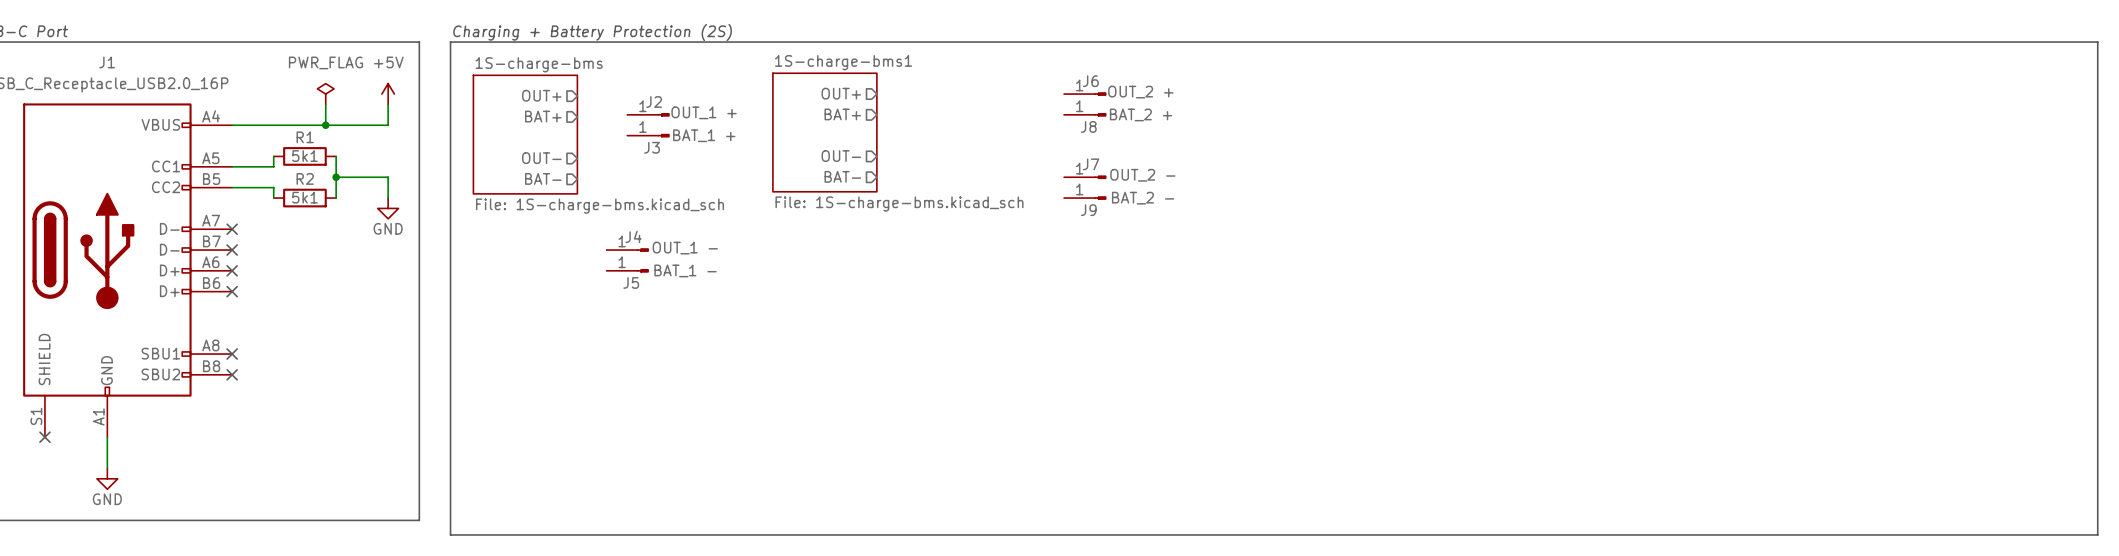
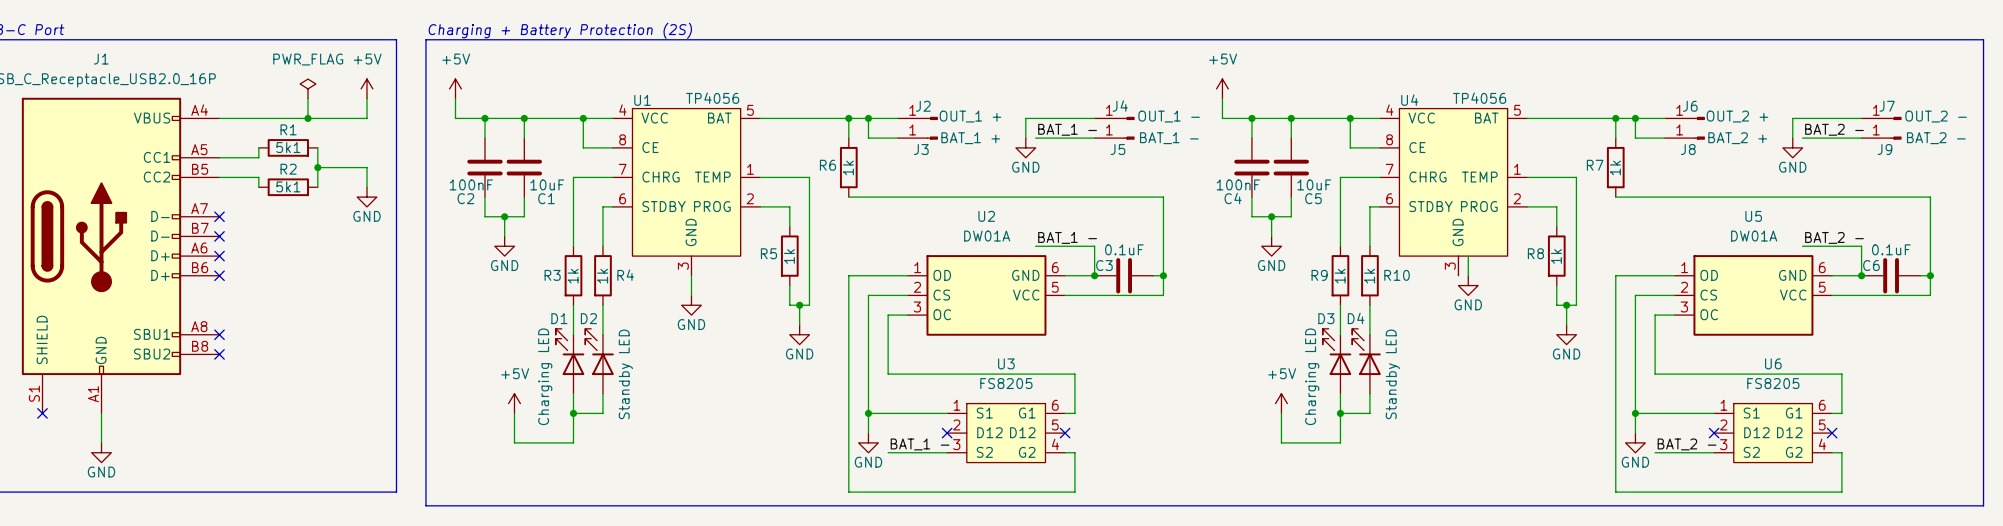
sheet pin: OUT+ (841, 93) -> none
power symbol: none -> +5V (455, 88)
J6 position: (1085, 94) -> (1684, 118)
power symbol: none -> +5V (1222, 88)
sheet pin: OUT+ (541, 95) -> none
wire: none -> (455, 98) (455, 118) (612, 118)
wire: none -> (1222, 98) (1222, 118) (1379, 118)
J2 position: (648, 114) -> (917, 118)
sheet pin: BAT+ (842, 114) -> none
J8 position: (1085, 114) -> (1684, 138)
sheet pin: BAT+ (543, 116) -> none
wire: none -> (484, 118) (484, 138)
junction: none -> (484, 118)
wire: none -> (524, 118) (524, 138)
junction: none -> (524, 118)
wire: none -> (583, 118) (583, 147) (612, 147)
junction: none -> (583, 118)
wire: none -> (760, 118) (897, 118)
wire: none -> (848, 118) (848, 138)
junction: none -> (848, 118)
wire: none -> (868, 118) (868, 138) (897, 138)
junction: none -> (868, 118)
wire: none -> (1094, 118) (1025, 118) (1025, 138)
wire: none -> (1251, 118) (1251, 138)
junction: none -> (1251, 118)
wire: none -> (1291, 118) (1291, 138)
junction: none -> (1291, 118)
wire: none -> (1350, 118) (1350, 147) (1379, 147)
junction: none -> (1350, 118)
wire: none -> (1527, 118) (1664, 118)
wire: none -> (1615, 118) (1615, 138)
junction: none -> (1615, 118)
wire: none -> (1635, 118) (1635, 138) (1664, 138)
junction: none -> (1635, 118)
wire: none -> (1861, 118) (1792, 118) (1792, 138)
sheet 1S-charge-bms1: File: 1S-charge-bms.kicad_sch (824, 132) -> none
sheet 1S-charge-bms: File: 1S-charge-bms.kicad_sch (525, 134) -> none
J3 position: (648, 135) -> (917, 138)
label: none -> BAT_1 - (1067, 129)
label: none -> BAT_2 - (1834, 129)
wire: none -> (1035, 138) (1094, 138)
wire: none -> (1802, 138) (1861, 138)
sheet pin: OUT- (841, 156) -> none
power symbol: none -> GND (1025, 147)
power symbol: none -> GND (1792, 147)
sheet pin: OUT- (541, 158) -> none
sheet pin: BAT- (842, 176) -> none
C2: none -> 100nF (484, 167)
C1: none -> 10uF (524, 167)
R6: none -> 1k (848, 167)
J7 position: (1085, 177) -> (1881, 118)
C4: none -> 100nF (1251, 167)
C5: none -> 10uF (1291, 167)
R7: none -> 1k (1615, 167)
sheet pin: BAT- (543, 178) -> none
wire: none -> (612, 177) (573, 177) (573, 246)
wire: none -> (760, 177) (809, 177) (809, 305) (789, 305) (789, 285)
wire: none -> (1379, 177) (1340, 177) (1340, 246)
wire: none -> (1527, 177) (1576, 177) (1576, 305) (1556, 305) (1556, 285)
J9 position: (1085, 198) -> (1881, 138)
U1: none -> TP4056 (686, 192)
U4: none -> TP4056 (1453, 192)
wire: none -> (484, 197) (484, 216) (524, 216) (524, 197)
wire: none -> (848, 197) (1163, 197) (1163, 295) (1065, 295)
wire: none -> (1251, 197) (1251, 216) (1291, 216) (1291, 197)
wire: none -> (1615, 197) (1930, 197) (1930, 295) (1832, 295)
wire: none -> (612, 206) (602, 206) (602, 246)
wire: none -> (760, 206) (789, 206) (789, 226)
wire: none -> (1379, 206) (1369, 206) (1369, 246)
wire: none -> (1527, 206) (1556, 206) (1556, 226)
wire: none -> (504, 216) (504, 236)
junction: none -> (504, 216)
wire: none -> (1271, 216) (1271, 236)
junction: none -> (1271, 216)
J4 position: (627, 250) -> (1114, 118)
label: none -> BAT_1 - (1067, 237)
label: none -> BAT_2 - (1834, 237)
power symbol: none -> GND (504, 246)
wire: none -> (1035, 246) (1094, 246) (1094, 275) (1065, 275)
power symbol: none -> GND (1271, 246)
wire: none -> (1802, 246) (1861, 246) (1861, 275) (1832, 275)
J5 position: (627, 270) -> (1114, 138)
R5: none -> 1k (789, 256)
wire: none -> (1468, 256) (1468, 275)
R8: none -> 1k (1556, 256)
R3: none -> 1k (573, 275)
R4: none -> 1k (602, 275)
wire: none -> (691, 275) (691, 295)
wire: none -> (907, 275) (848, 275) (848, 492) (1074, 492) (1074, 452) (1065, 452)
junction: none -> (1094, 275)
C3: none -> 0.1uF (1124, 275)
wire: none -> (1153, 275) (1163, 275)
junction: none -> (1163, 275)
R9: none -> 1k (1340, 275)
R10: none -> 1k (1369, 275)
wire: none -> (1674, 275) (1615, 275) (1615, 492) (1841, 492) (1841, 452) (1832, 452)
junction: none -> (1861, 275)
C6: none -> 0.1uF (1891, 275)
wire: none -> (1920, 275) (1930, 275)
junction: none -> (1930, 275)
power symbol: none -> GND (1468, 285)
wire: none -> (907, 295) (868, 295) (868, 433)
U2: none -> DW01A (986, 295)
wire: none -> (1674, 295) (1635, 295) (1635, 433)
U5: none -> DW01A (1753, 295)
wire: none -> (573, 305) (573, 334)
wire: none -> (602, 305) (602, 334)
power symbol: none -> GND (691, 305)
wire: none -> (799, 305) (799, 324)
junction: none -> (799, 305)
wire: none -> (1340, 305) (1340, 334)
wire: none -> (1369, 305) (1369, 334)
wire: none -> (1566, 305) (1566, 324)
junction: none -> (1566, 305)
wire: none -> (907, 315) (888, 315) (888, 374) (1074, 374) (1074, 413) (1065, 413)
wire: none -> (1674, 315) (1655, 315) (1655, 374) (1841, 374) (1841, 413) (1832, 413)
power symbol: none -> GND (799, 334)
power symbol: none -> GND (1566, 334)
D1: none -> Charging LED (570, 361)
D2: none -> Standby LED (599, 361)
D3: none -> Charging LED (1337, 361)
D4: none -> Standby LED (1366, 361)
wire: none -> (573, 393) (573, 442) (514, 442) (514, 413)
wire: none -> (602, 393) (602, 413) (573, 413)
wire: none -> (1340, 393) (1340, 442) (1281, 442) (1281, 413)
wire: none -> (1369, 393) (1369, 413) (1340, 413)
power symbol: none -> +5V (514, 403)
power symbol: none -> +5V (1281, 403)
junction: none -> (573, 413)
wire: none -> (868, 413) (947, 413)
junction: none -> (868, 413)
junction: none -> (1340, 413)
wire: none -> (1635, 413) (1714, 413)
junction: none -> (1635, 413)
no-connect mark: none -> (947, 433)
U3: none -> FS8205 (1006, 433)
no-connect mark: none -> (1065, 433)
no-connect mark: none -> (1714, 433)
U6: none -> FS8205 (1773, 433)
no-connect mark: none -> (1832, 433)
power symbol: none -> GND (868, 442)
power symbol: none -> GND (1635, 442)
label: none -> BAT_1 - (920, 444)
label: none -> BAT_2 - (1687, 444)
wire: none -> (888, 452) (947, 452)
wire: none -> (1655, 452) (1714, 452)

